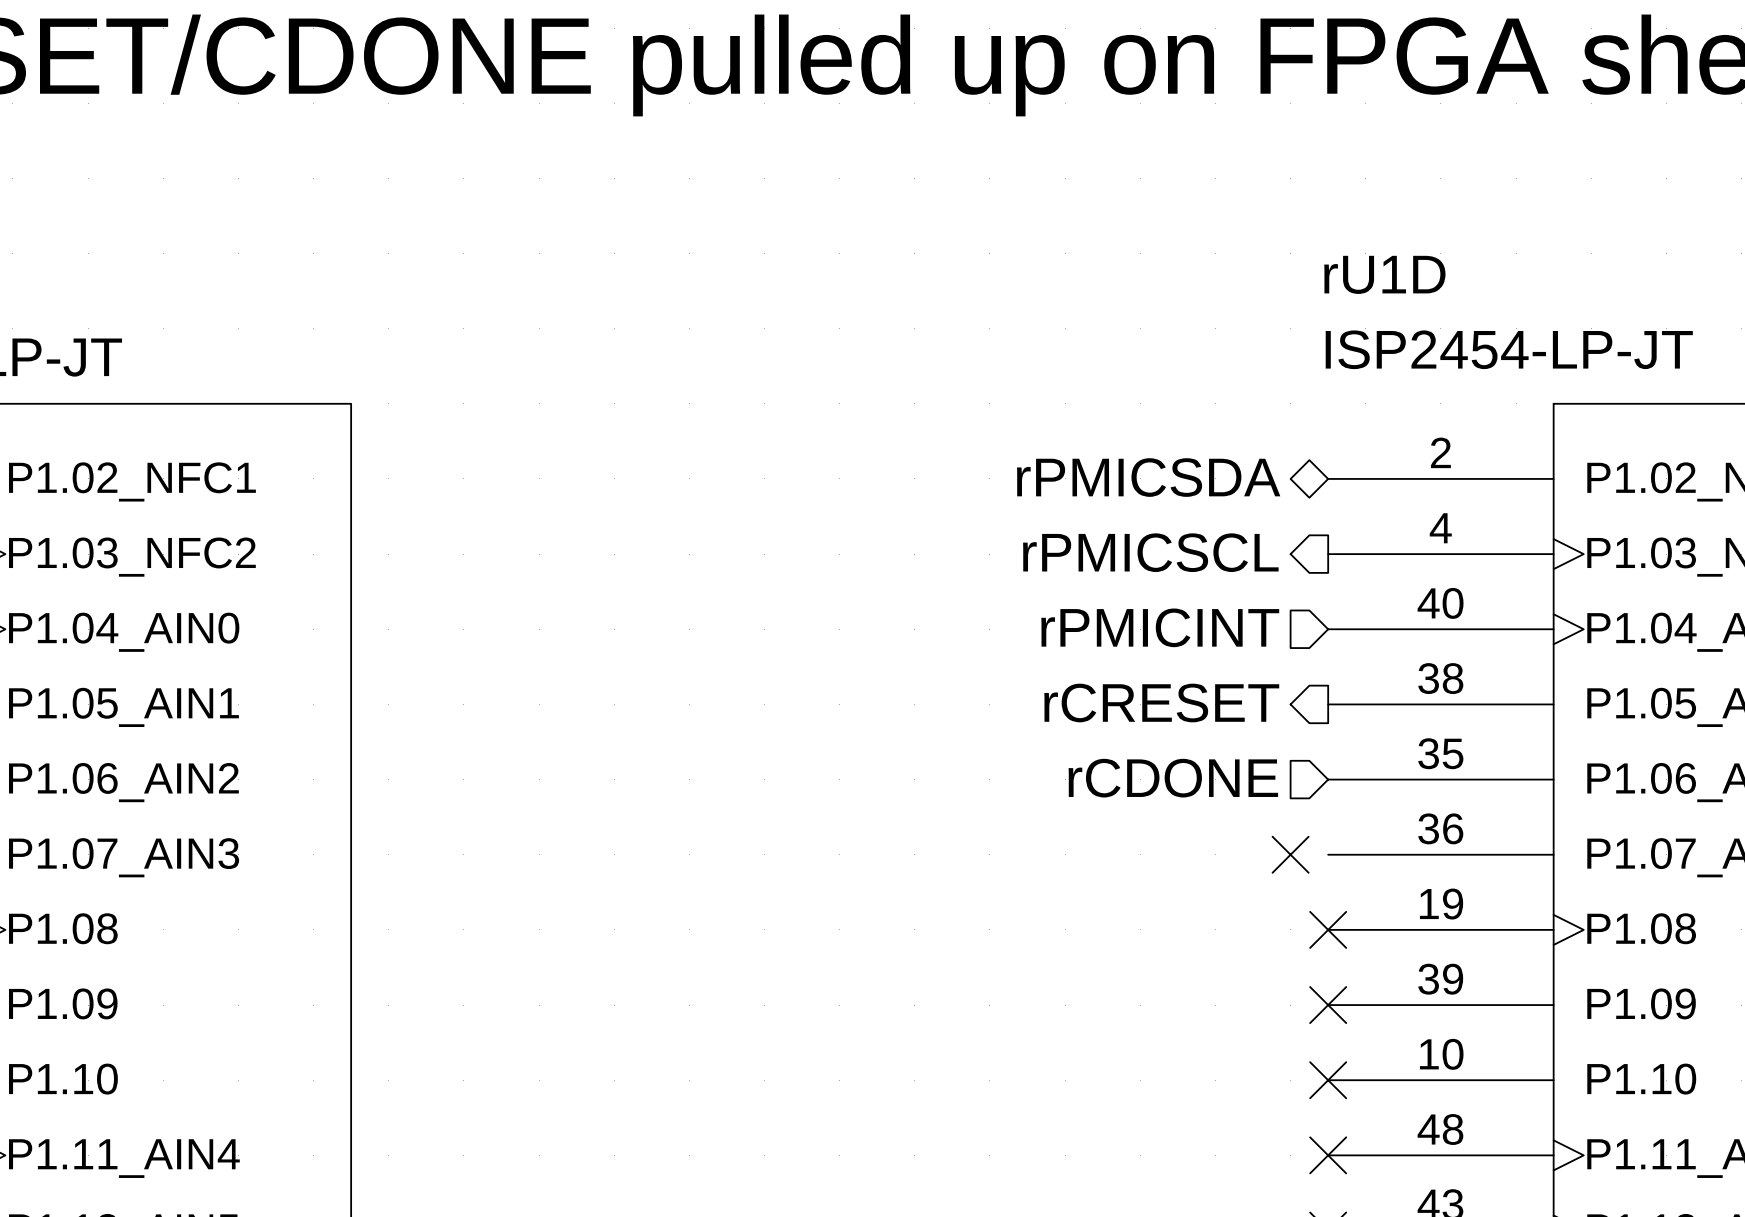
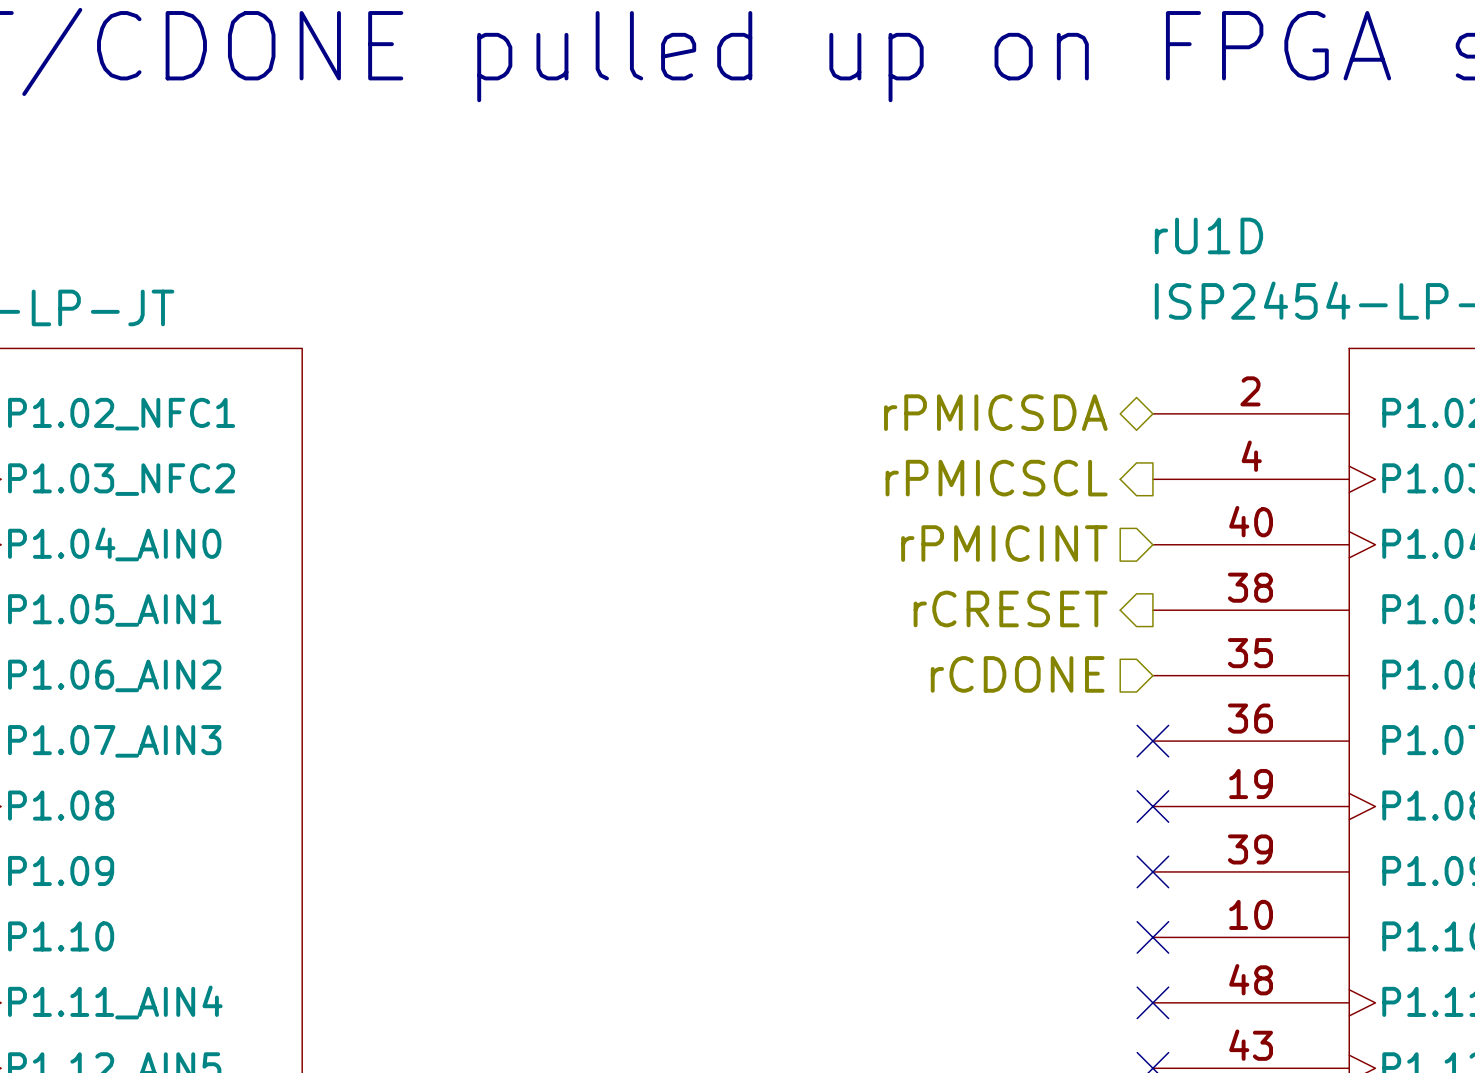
no-connect mark position: (1290, 854) -> (1152, 741)

